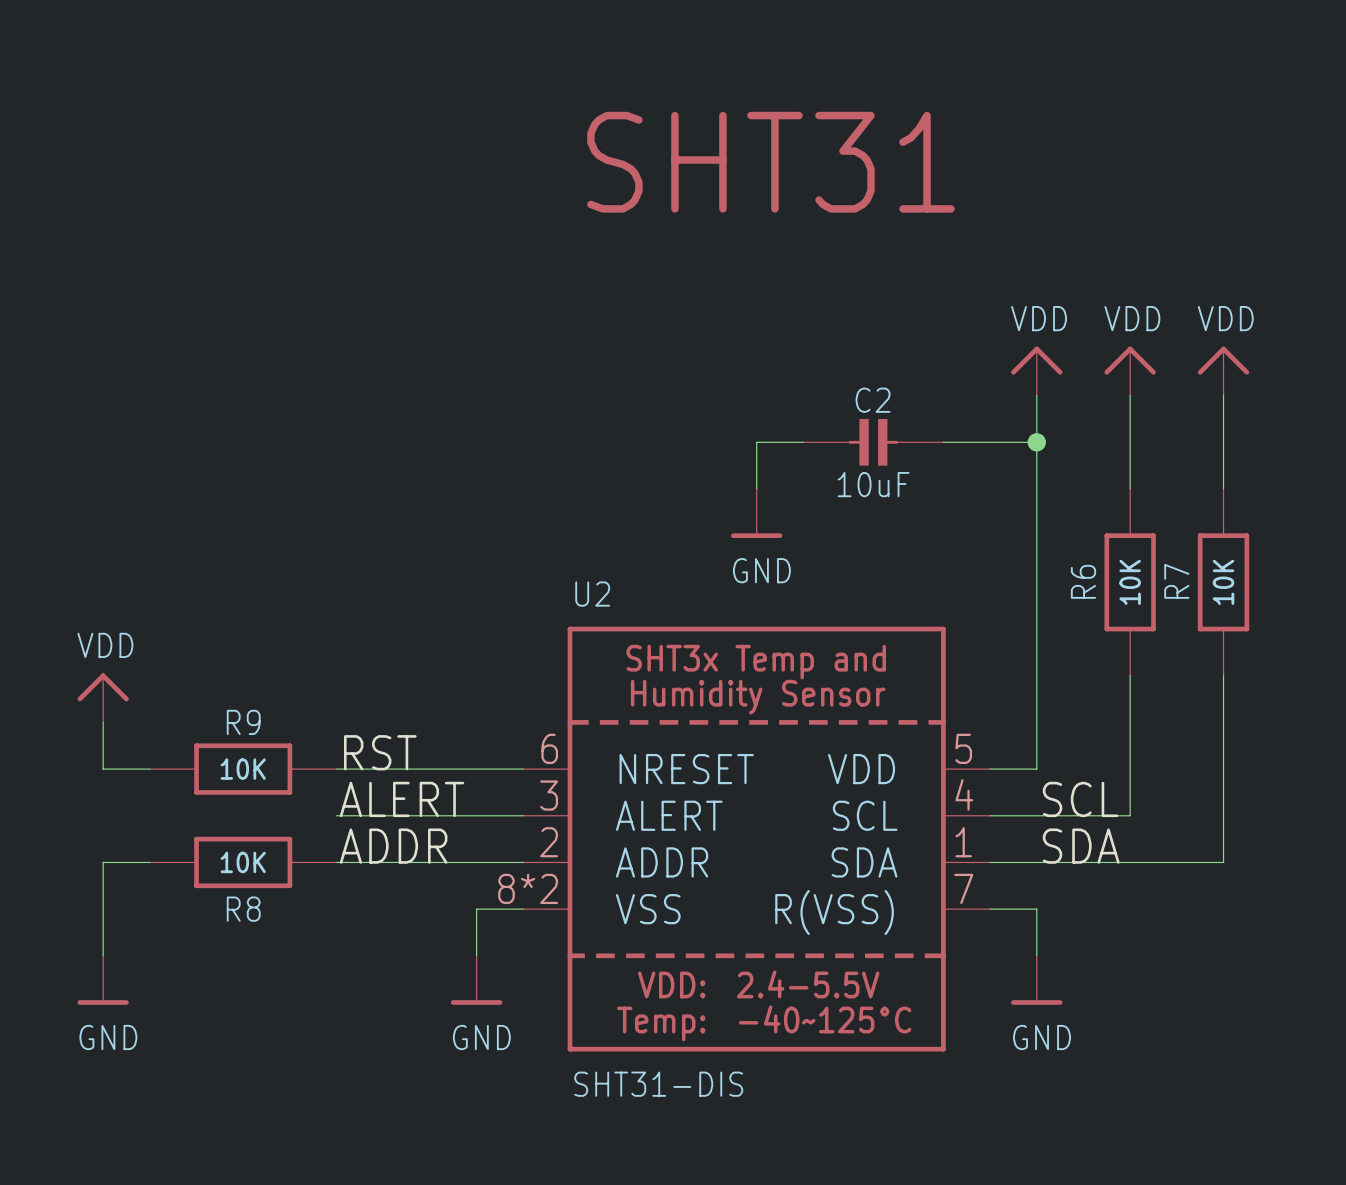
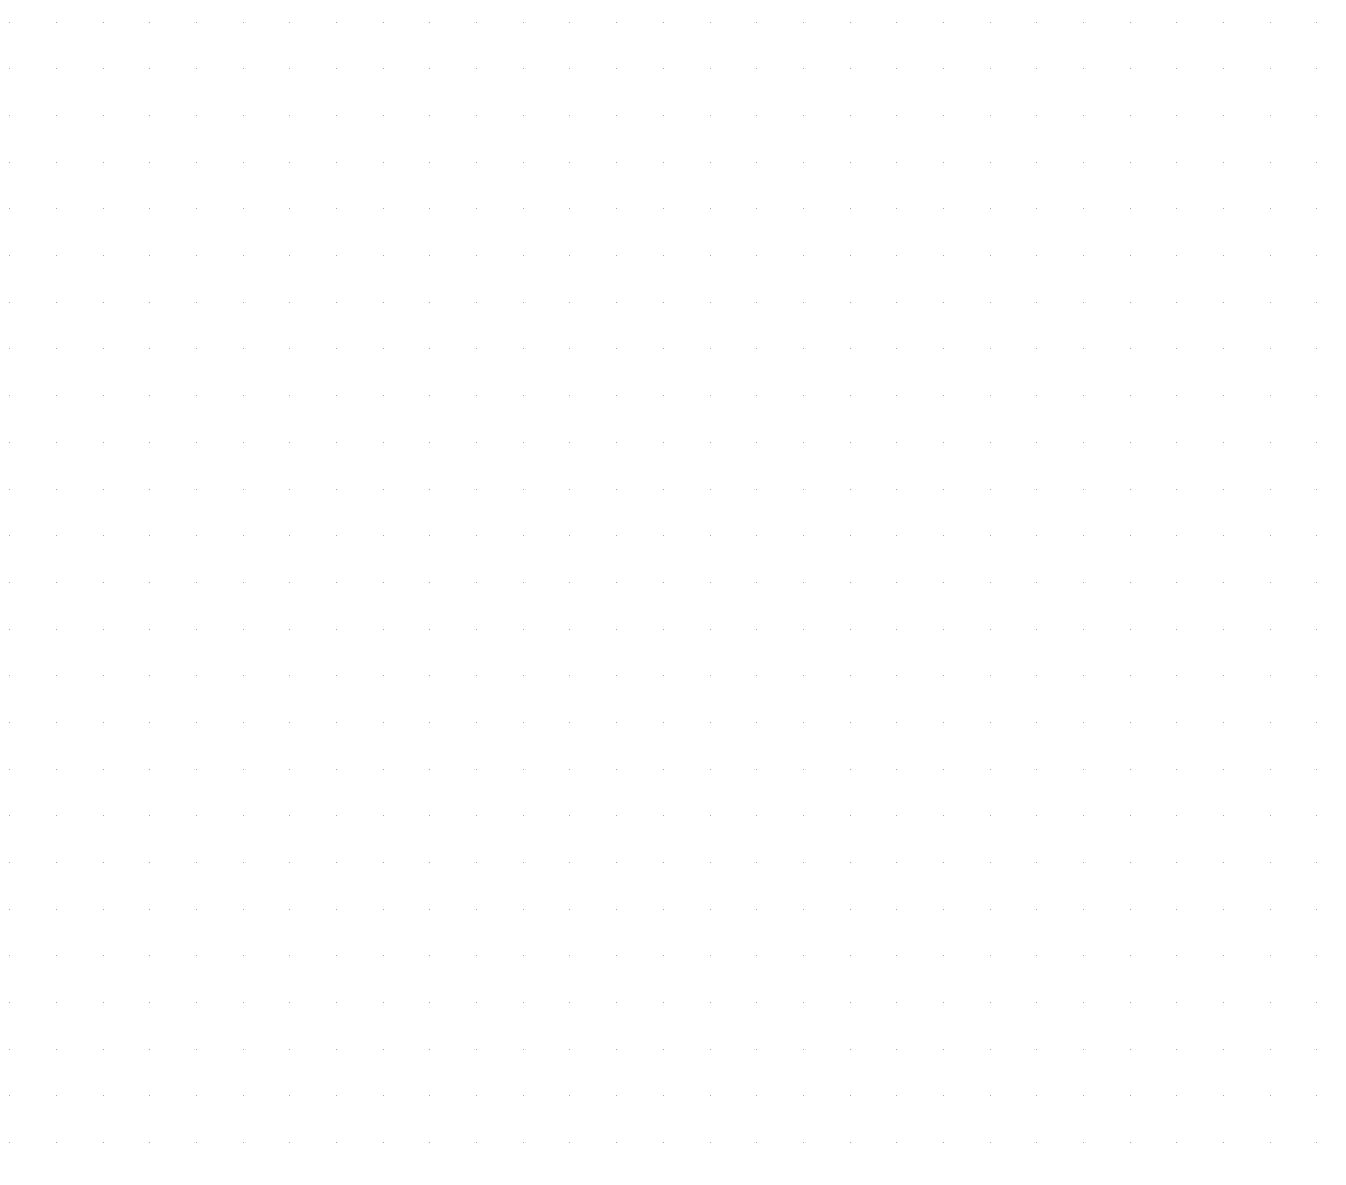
text: SHT31 (770, 162) -> none
power symbol: VDD (1036, 371) -> none
power symbol: VDD (1130, 371) -> none
power symbol: VDD (1223, 371) -> none
wire: (1036, 395) (1036, 769) (990, 769) -> none
wire: (1130, 395) (1130, 489) -> none
wire: (1223, 395) (1223, 489) -> none
wire: (803, 442) (756, 442) (756, 489) -> none
C2: 10uF (873, 442) -> none
wire: (943, 442) (1036, 442) -> none
junction: (1036, 442) -> none
power symbol: GND (756, 513) -> none
R6: 10K (1130, 582) -> none
R7: 10K (1223, 582) -> none
wire: (1130, 675) (1130, 815) (990, 815) -> none
wire: (1223, 675) (1223, 862) (990, 862) -> none
power symbol: VDD (103, 697) -> none
wire: (103, 722) (103, 769) (149, 769) -> none
label: RST (380, 752) -> none
R9: 10K (243, 769) -> none
wire: (336, 769) (523, 769) -> none
label: ALERT (402, 799) -> none
label: SCL (1080, 799) -> none
wire: (336, 815) (523, 815) -> none
U2: SHT31-DIS (756, 839) -> none
label: ADDR (393, 846) -> none
label: SDA (1081, 846) -> none
wire: (149, 862) (103, 862) (103, 955) -> none
R8: 10K (243, 862) -> none
wire: (336, 862) (523, 862) -> none
wire: (523, 909) (476, 909) (476, 955) -> none
wire: (990, 909) (1036, 909) (1036, 955) -> none
power symbol: GND (103, 980) -> none
power symbol: GND (476, 980) -> none
power symbol: GND (1036, 980) -> none

